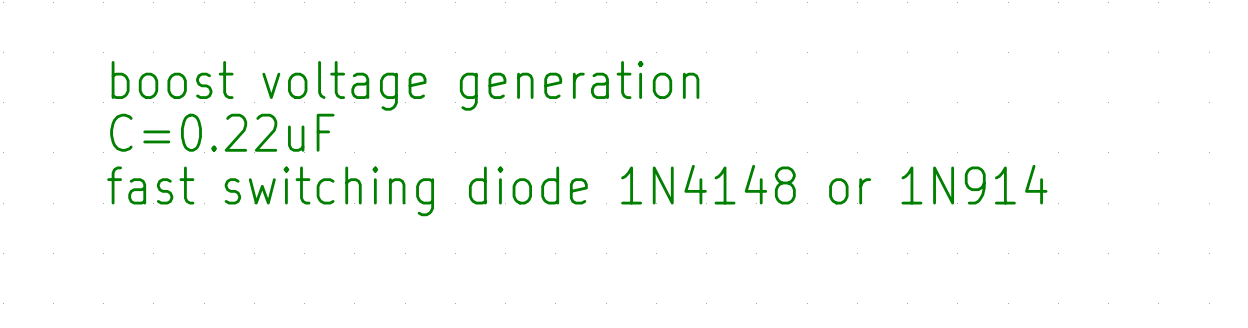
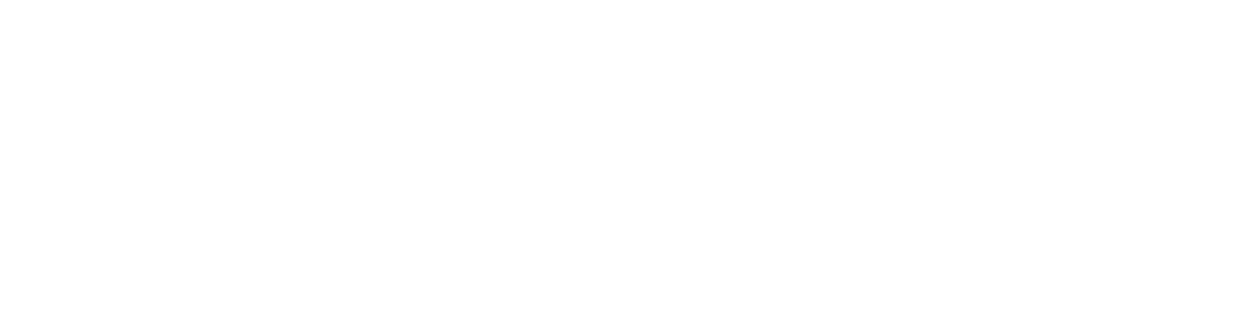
text: boost voltage generation (405, 85) -> none
text: C=0.22uF (222, 132) -> none
text: fast switching diode 1N4148 or 1N914 (577, 190) -> none

